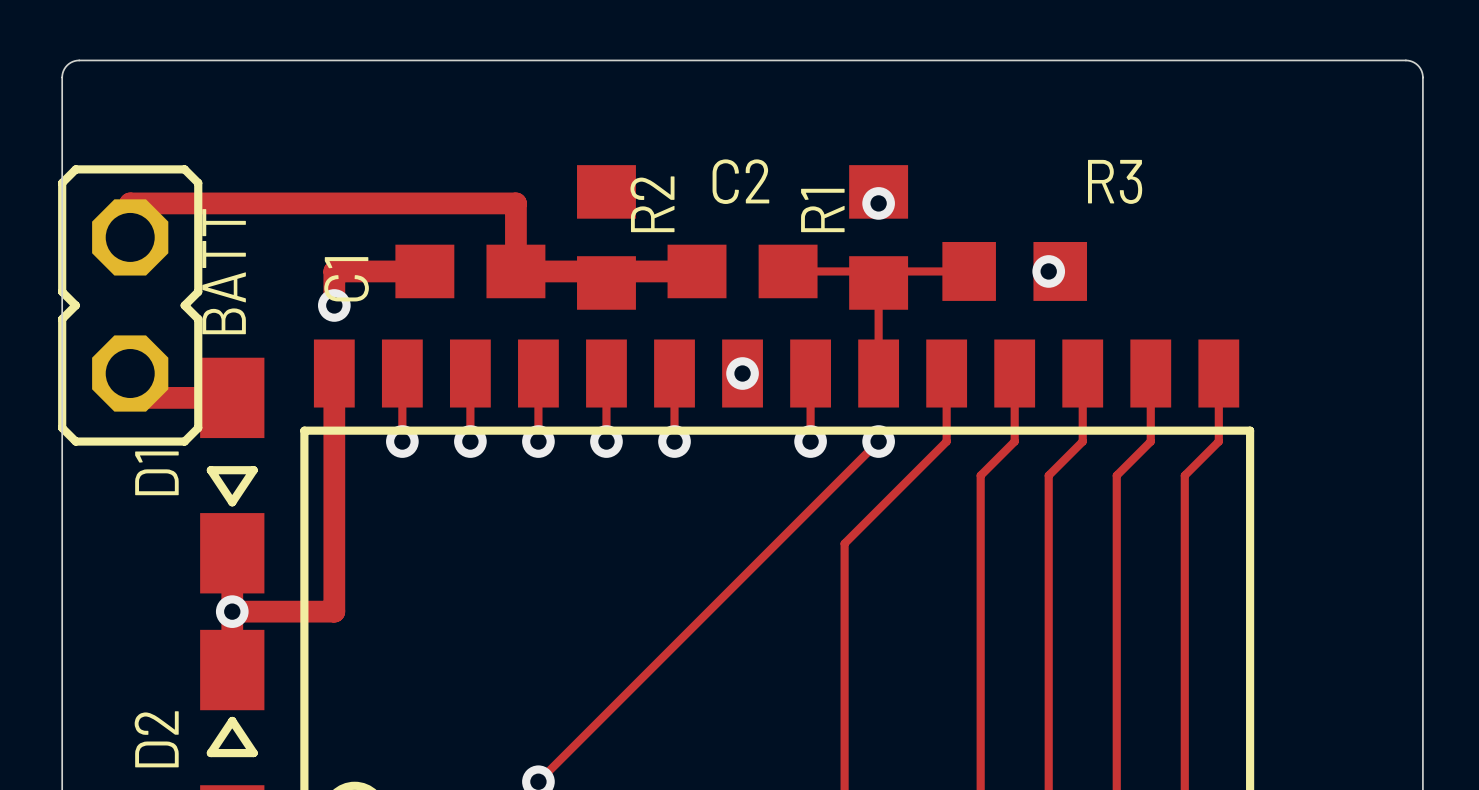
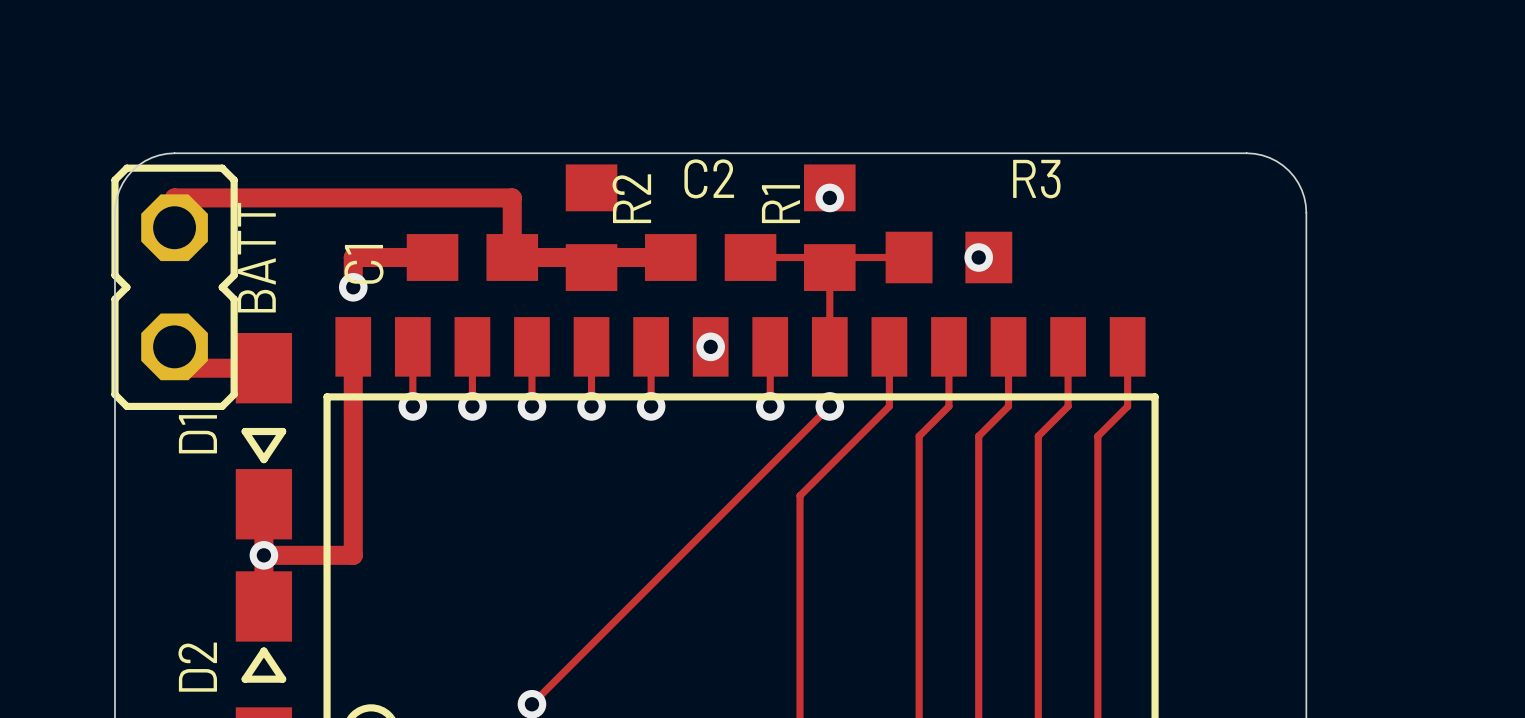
board edge: (62, 220) (62, 75) (67, 65) (79, 60) (1408, 60) (1417, 65) (1422, 75) (1422, 220) -> (114, 212) (119, 190) (132, 170) (151, 157) (174, 153) (1246, 153) (1269, 157) (1288, 170) (1301, 190) (1306, 212)

